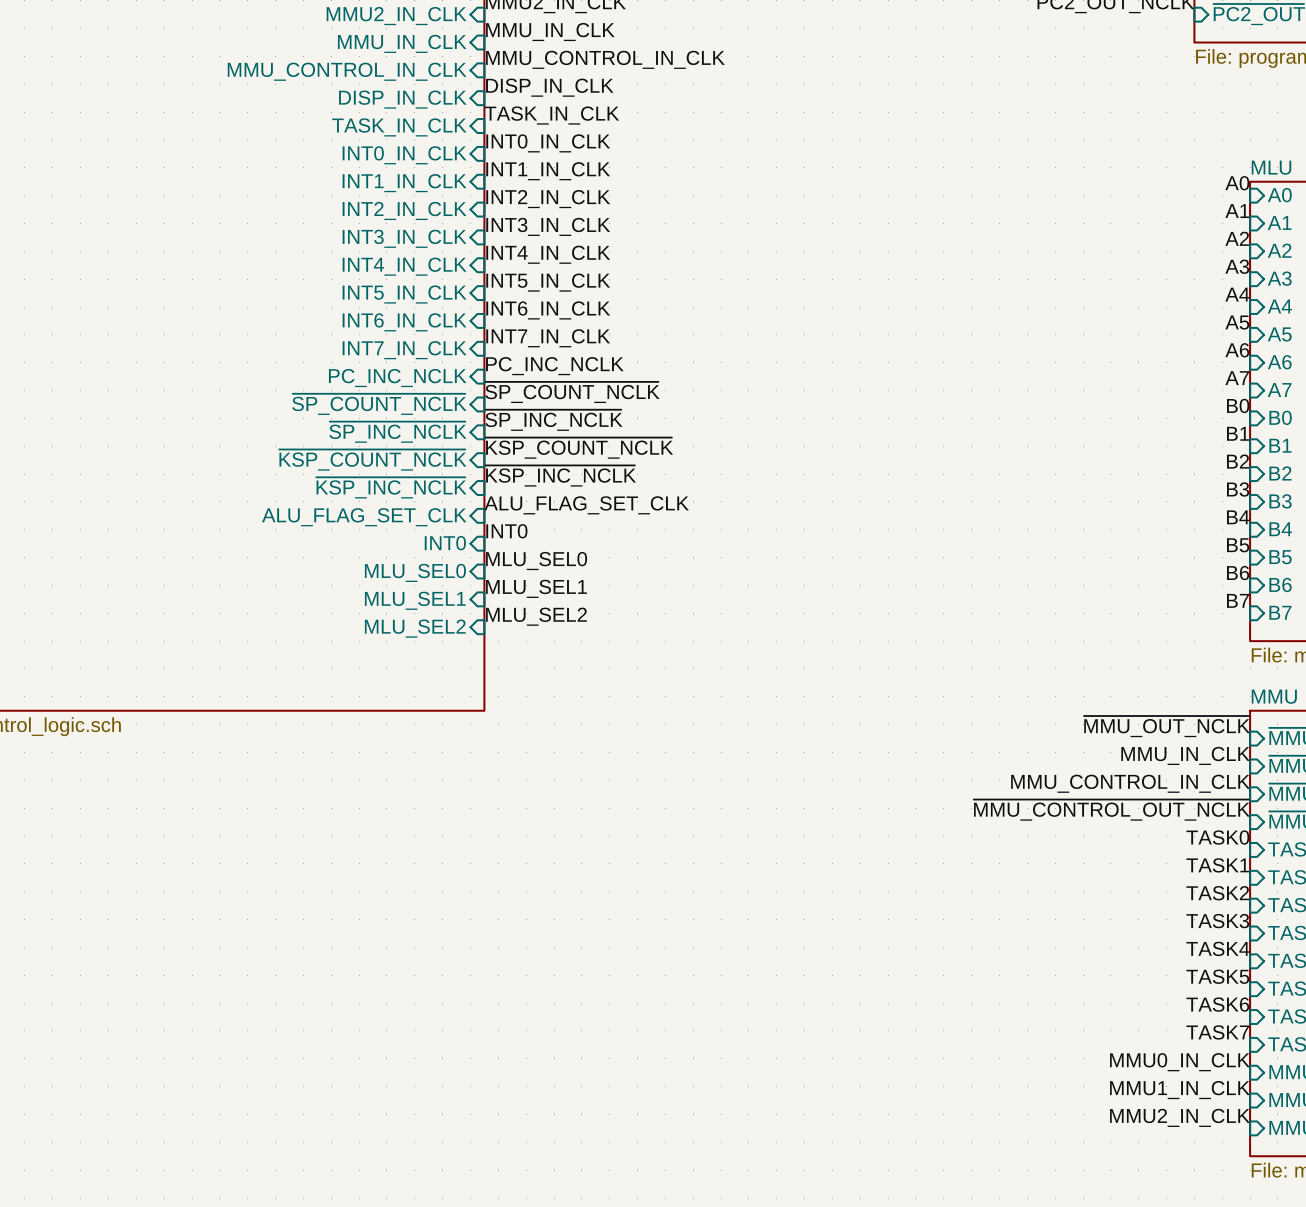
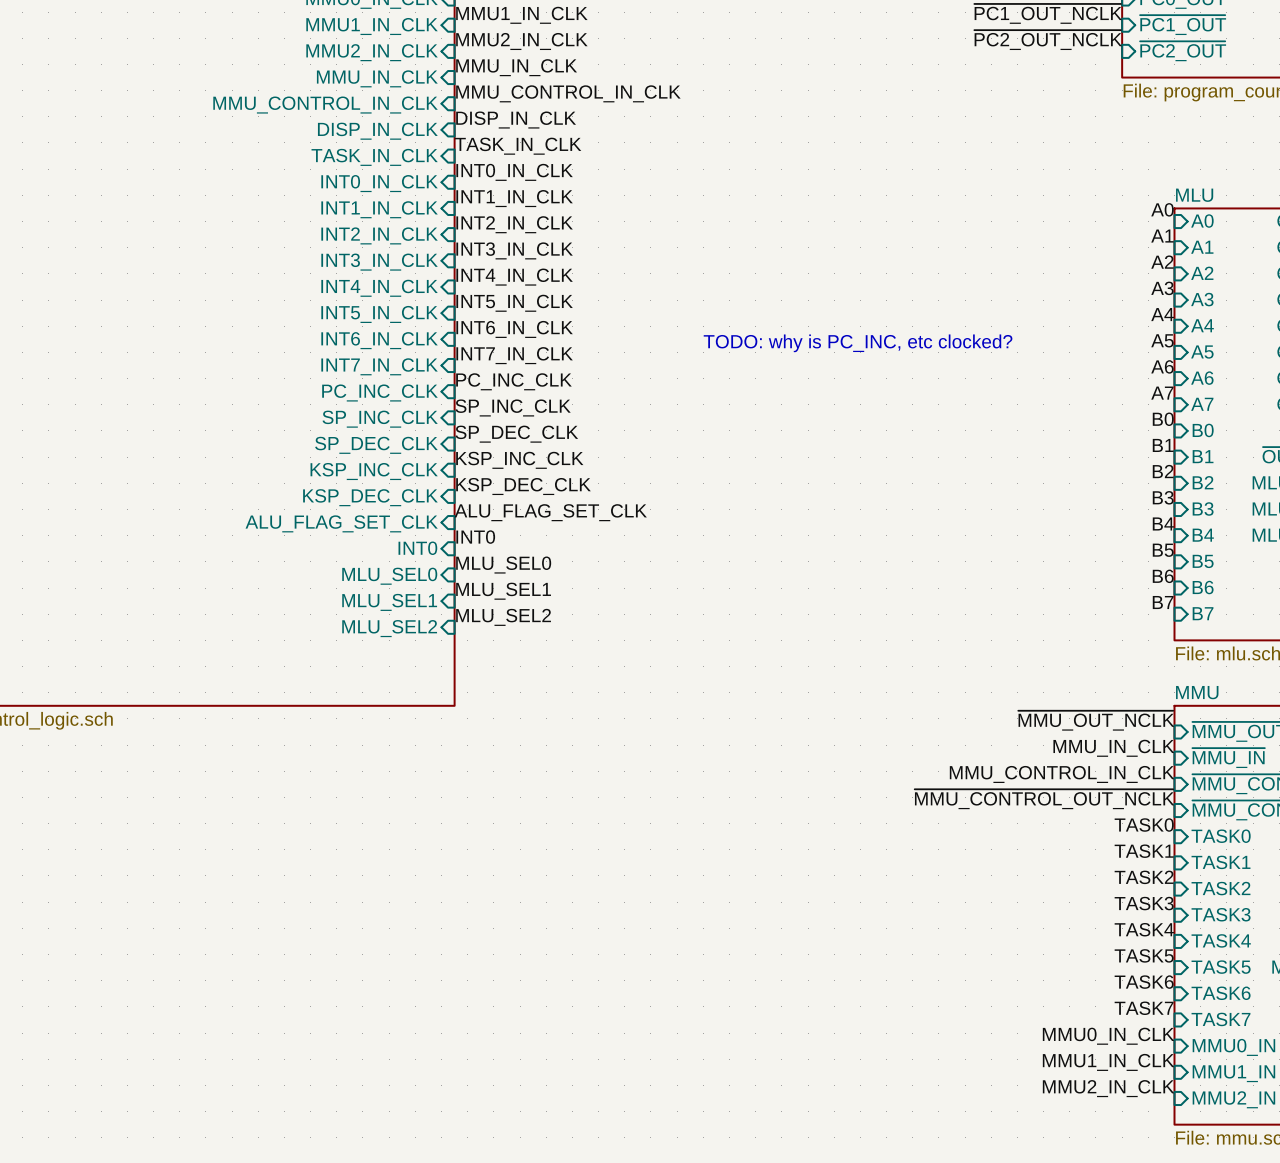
text: none -> TODO: why is PC_INC, etc clocked? (858, 343)
label: PC_INC_NCLK (554, 366) -> PC_INC_CLK (513, 381)
sheet pin: PC_INC_NCLK (397, 378) -> PC_INC_CLK (379, 392)
label: ~{SP_COUNT_NCLK} (572, 392) -> SP_INC_CLK (513, 407)
sheet pin: ~{SP_COUNT_NCLK} (379, 404) -> SP_INC_CLK (380, 419)
label: ~{SP_INC_NCLK} (553, 420) -> SP_DEC_CLK (516, 434)
sheet pin: ~{SP_INC_NCLK} (397, 432) -> SP_DEC_CLK (376, 445)
label: ~{KSP_COUNT_NCLK} (579, 448) -> KSP_INC_CLK (519, 460)
sheet pin: ~{KSP_COUNT_NCLK} (372, 460) -> KSP_INC_CLK (374, 471)
label: ~{KSP_INC_NCLK} (560, 475) -> KSP_DEC_CLK (523, 486)
sheet pin: ~{KSP_INC_NCLK} (391, 487) -> KSP_DEC_CLK (370, 497)

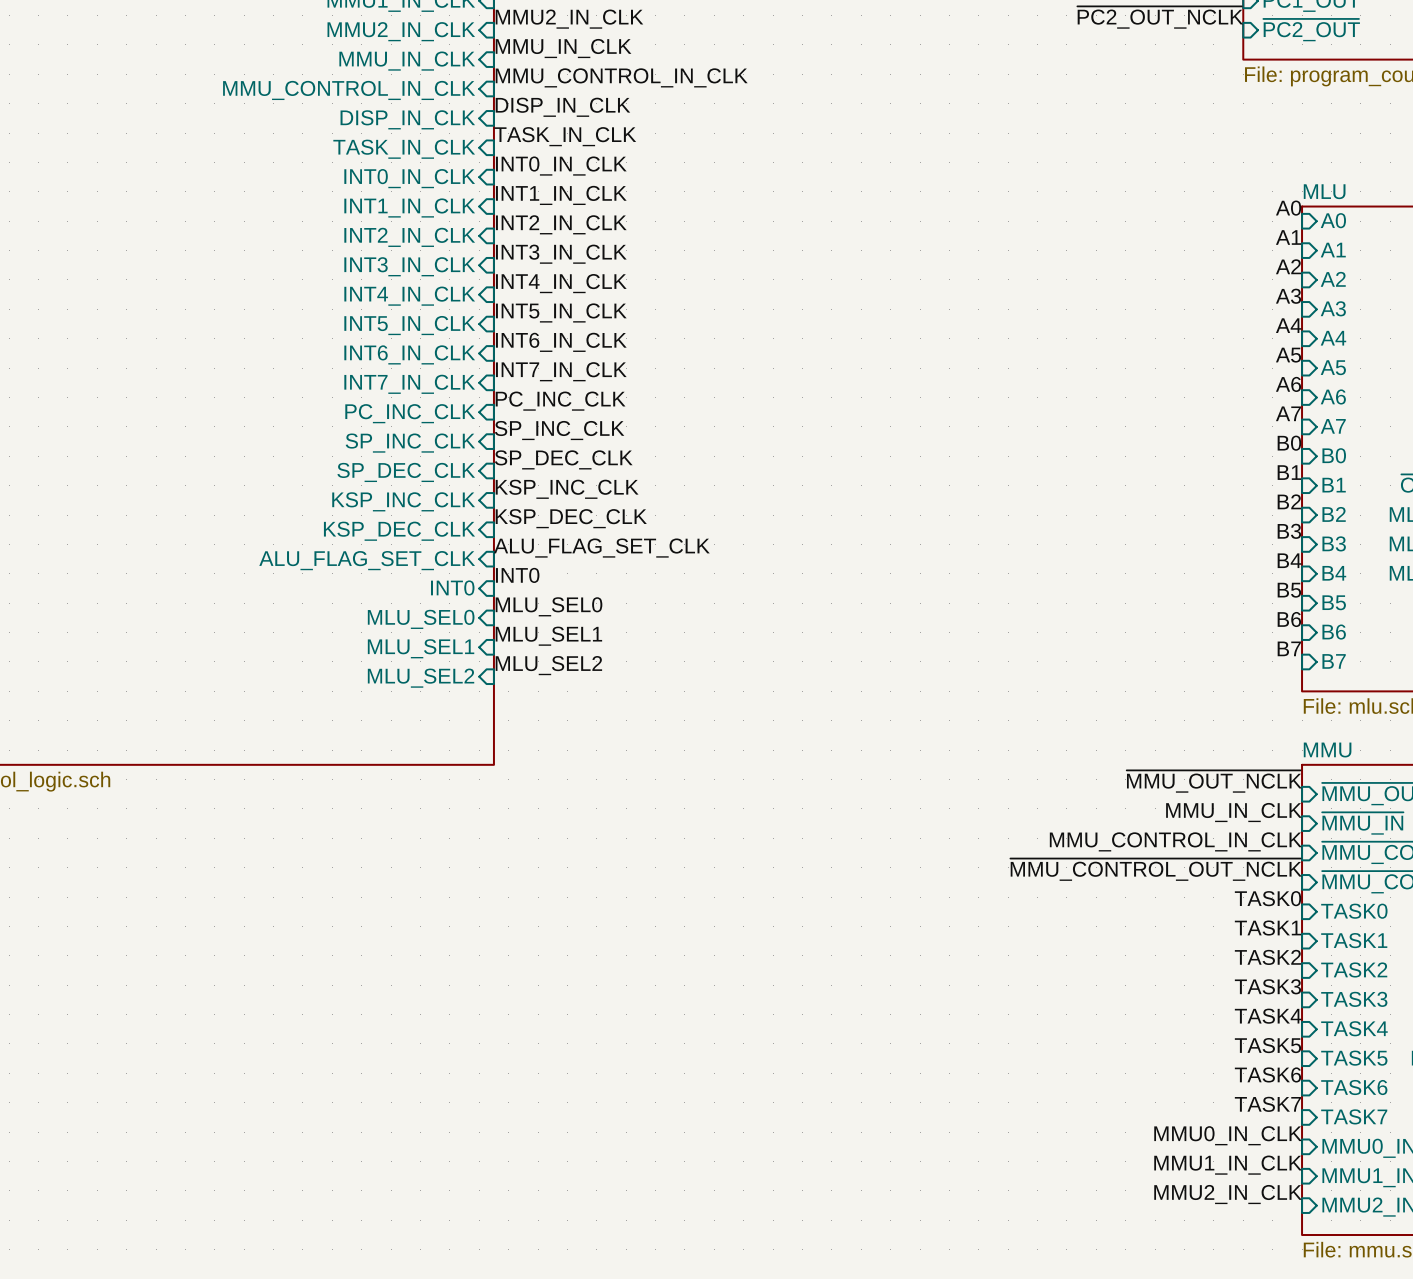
text: TODO: why is PC_INC, etc clocked? (858, 343) -> none

